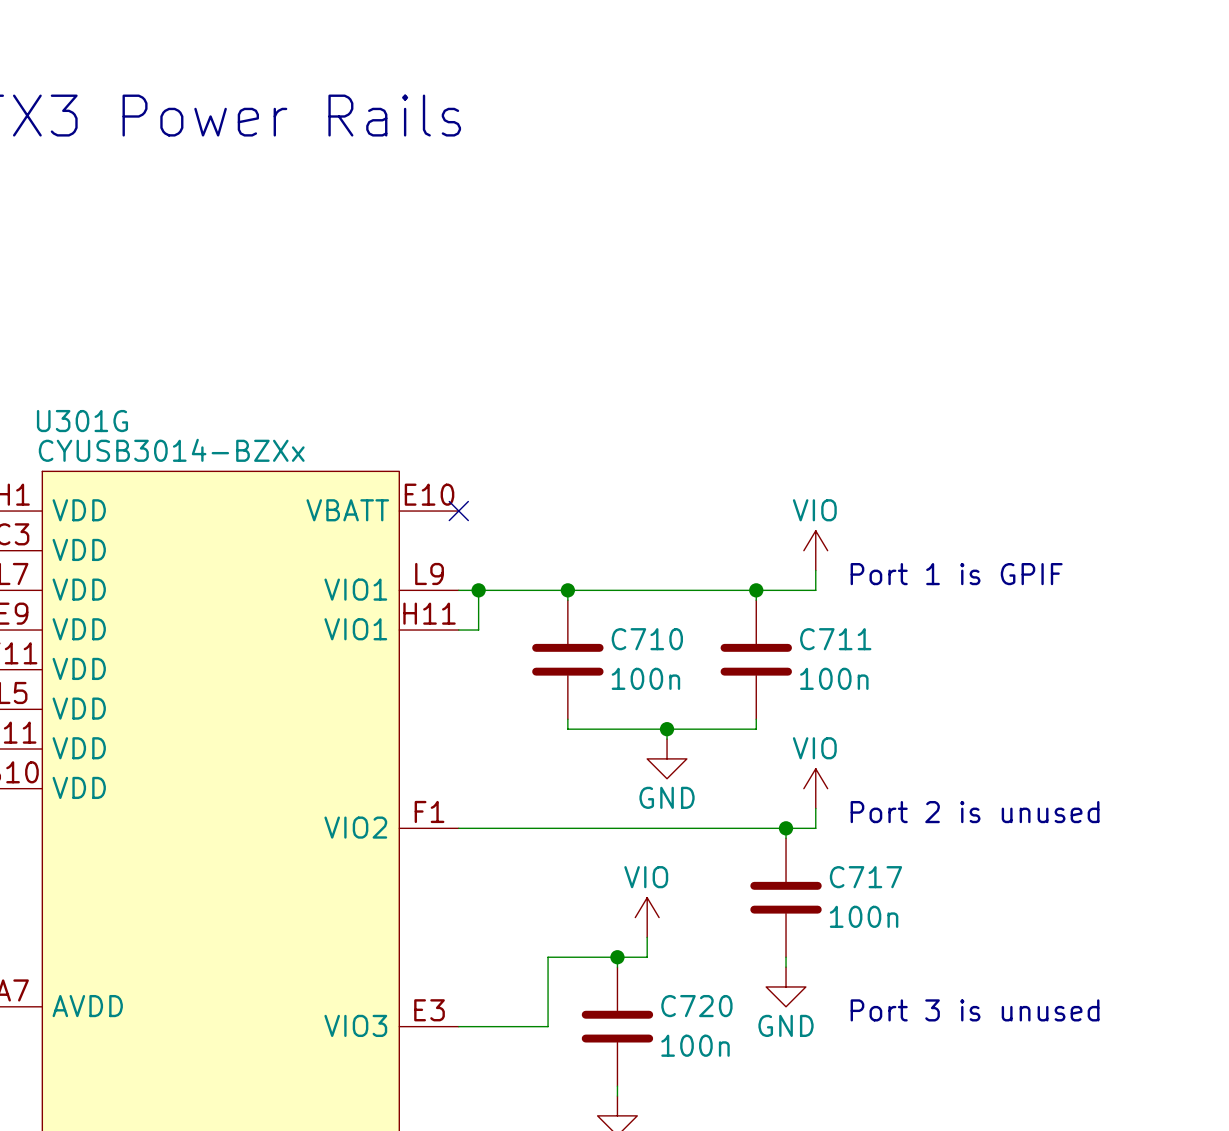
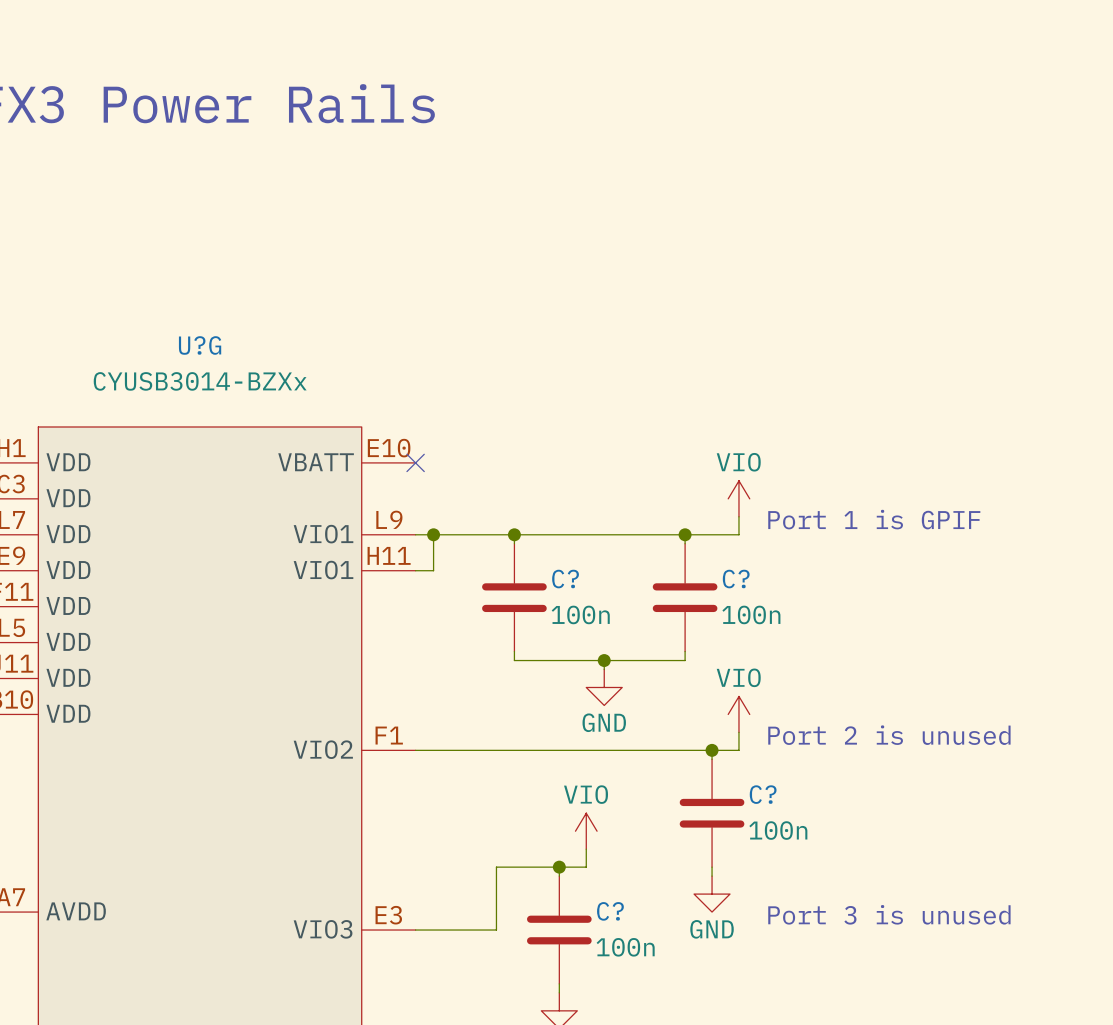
U301G name: U301G (82, 421) -> U?G (200, 345)
U301G value position: CYUSB3014-BZXx (171, 450) -> CYUSB3014-BZXx (200, 381)
C710 name: C710 (647, 639) -> C? (565, 579)
C711 name: C711 (835, 639) -> C? (736, 579)
C717 name: C717 (865, 877) -> C? (763, 794)
C720 name: C720 (696, 1006) -> C? (610, 911)

